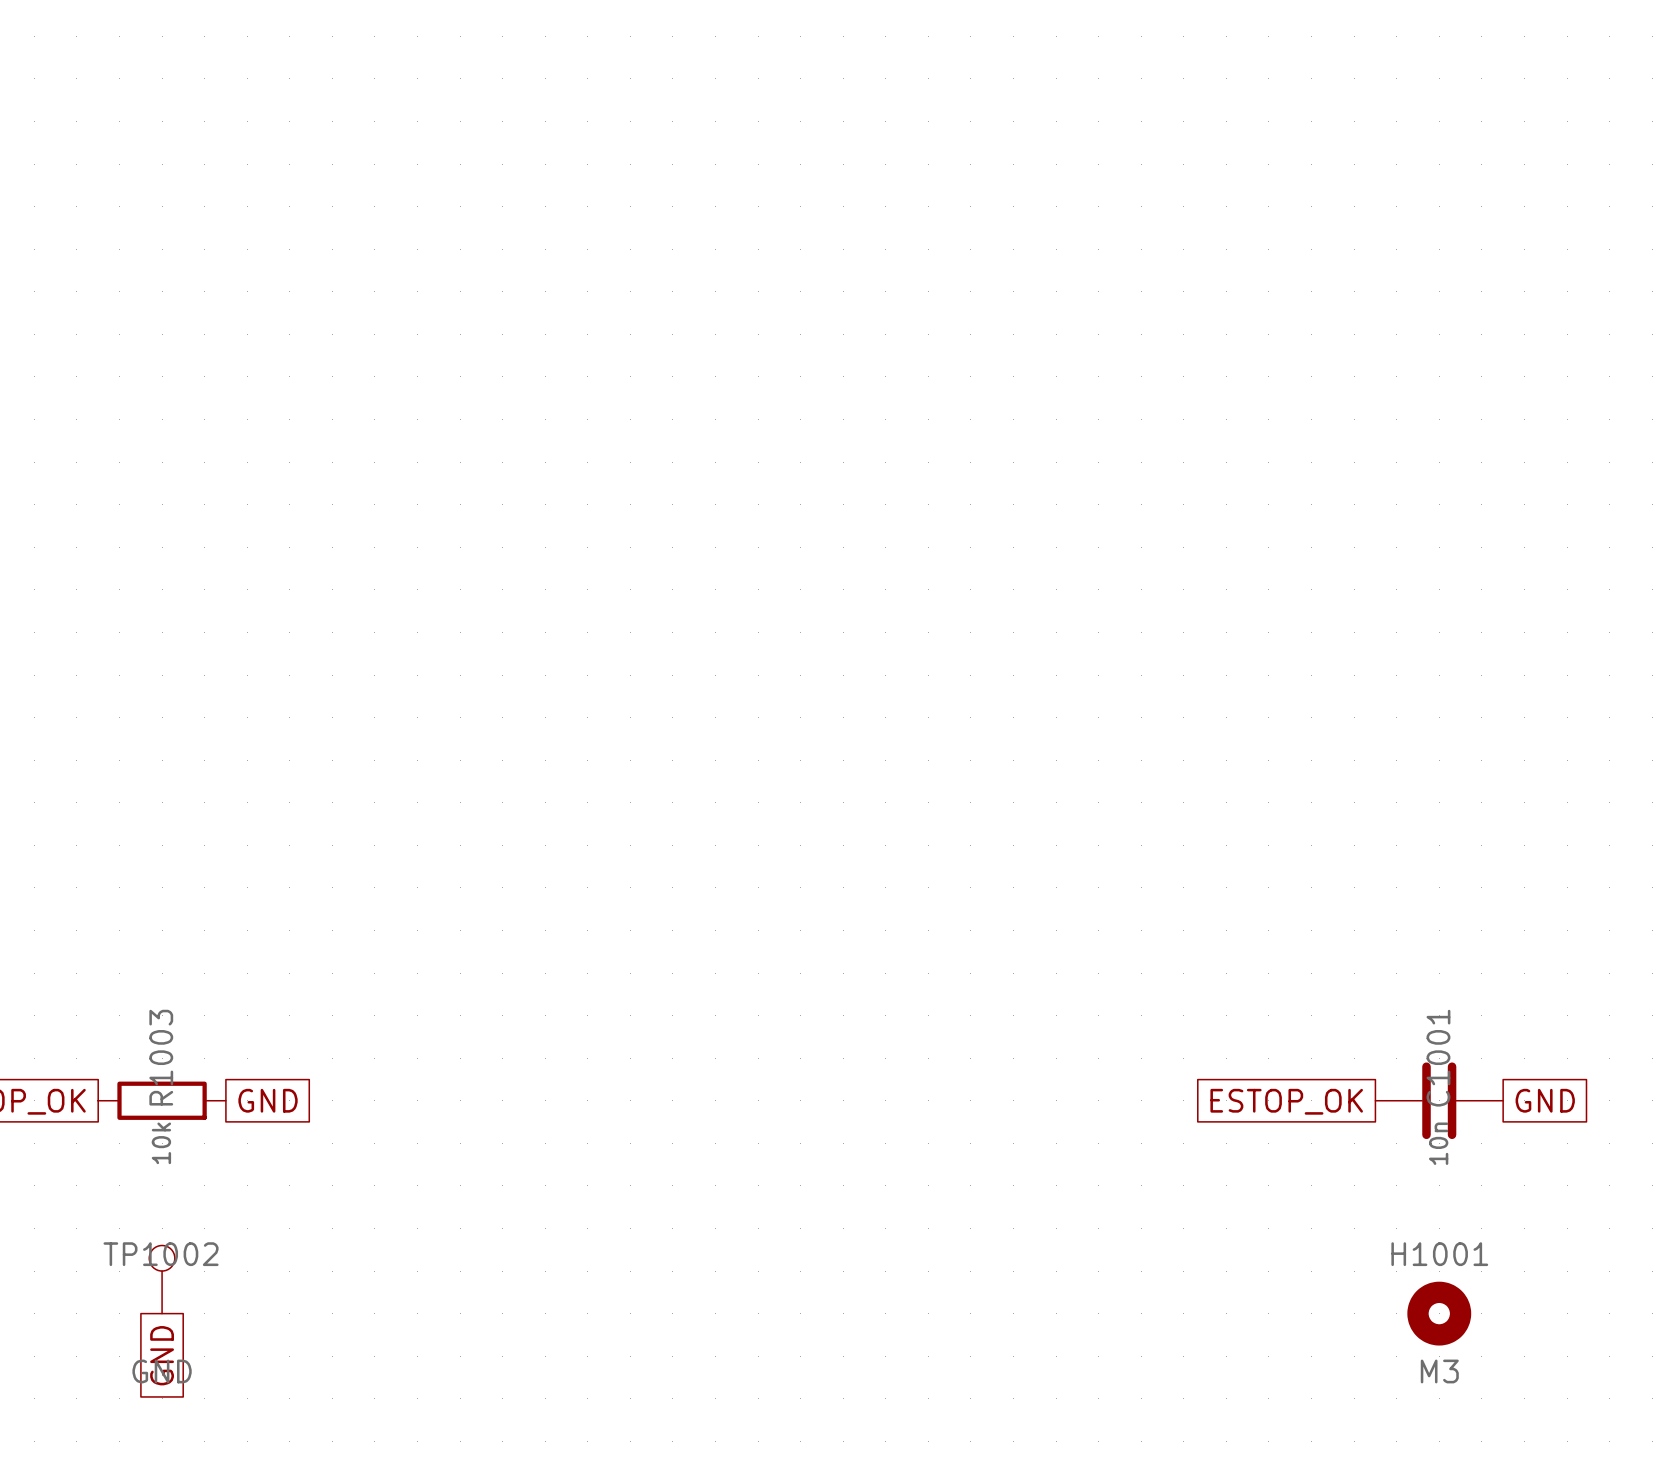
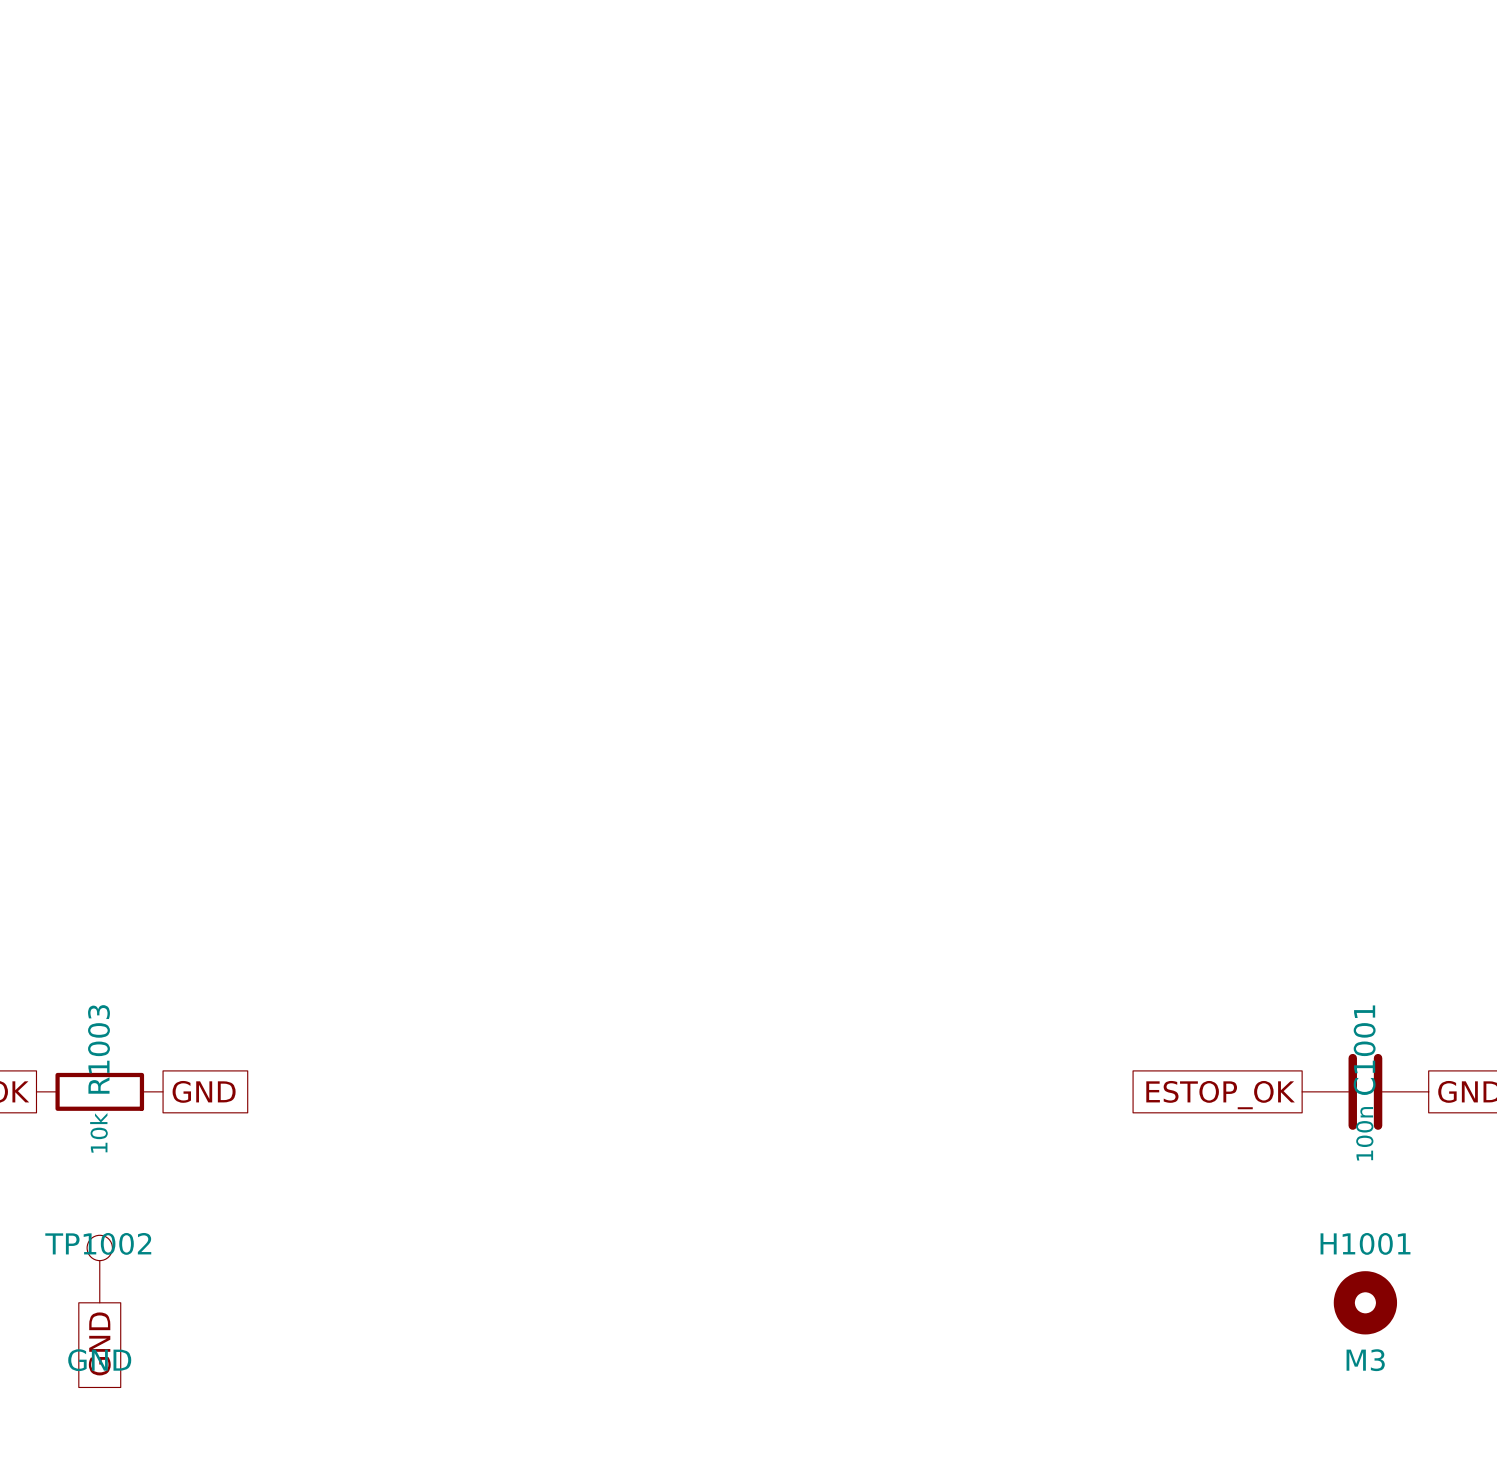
C1001 value: 10n (1438, 1143) -> 100n (1364, 1133)

